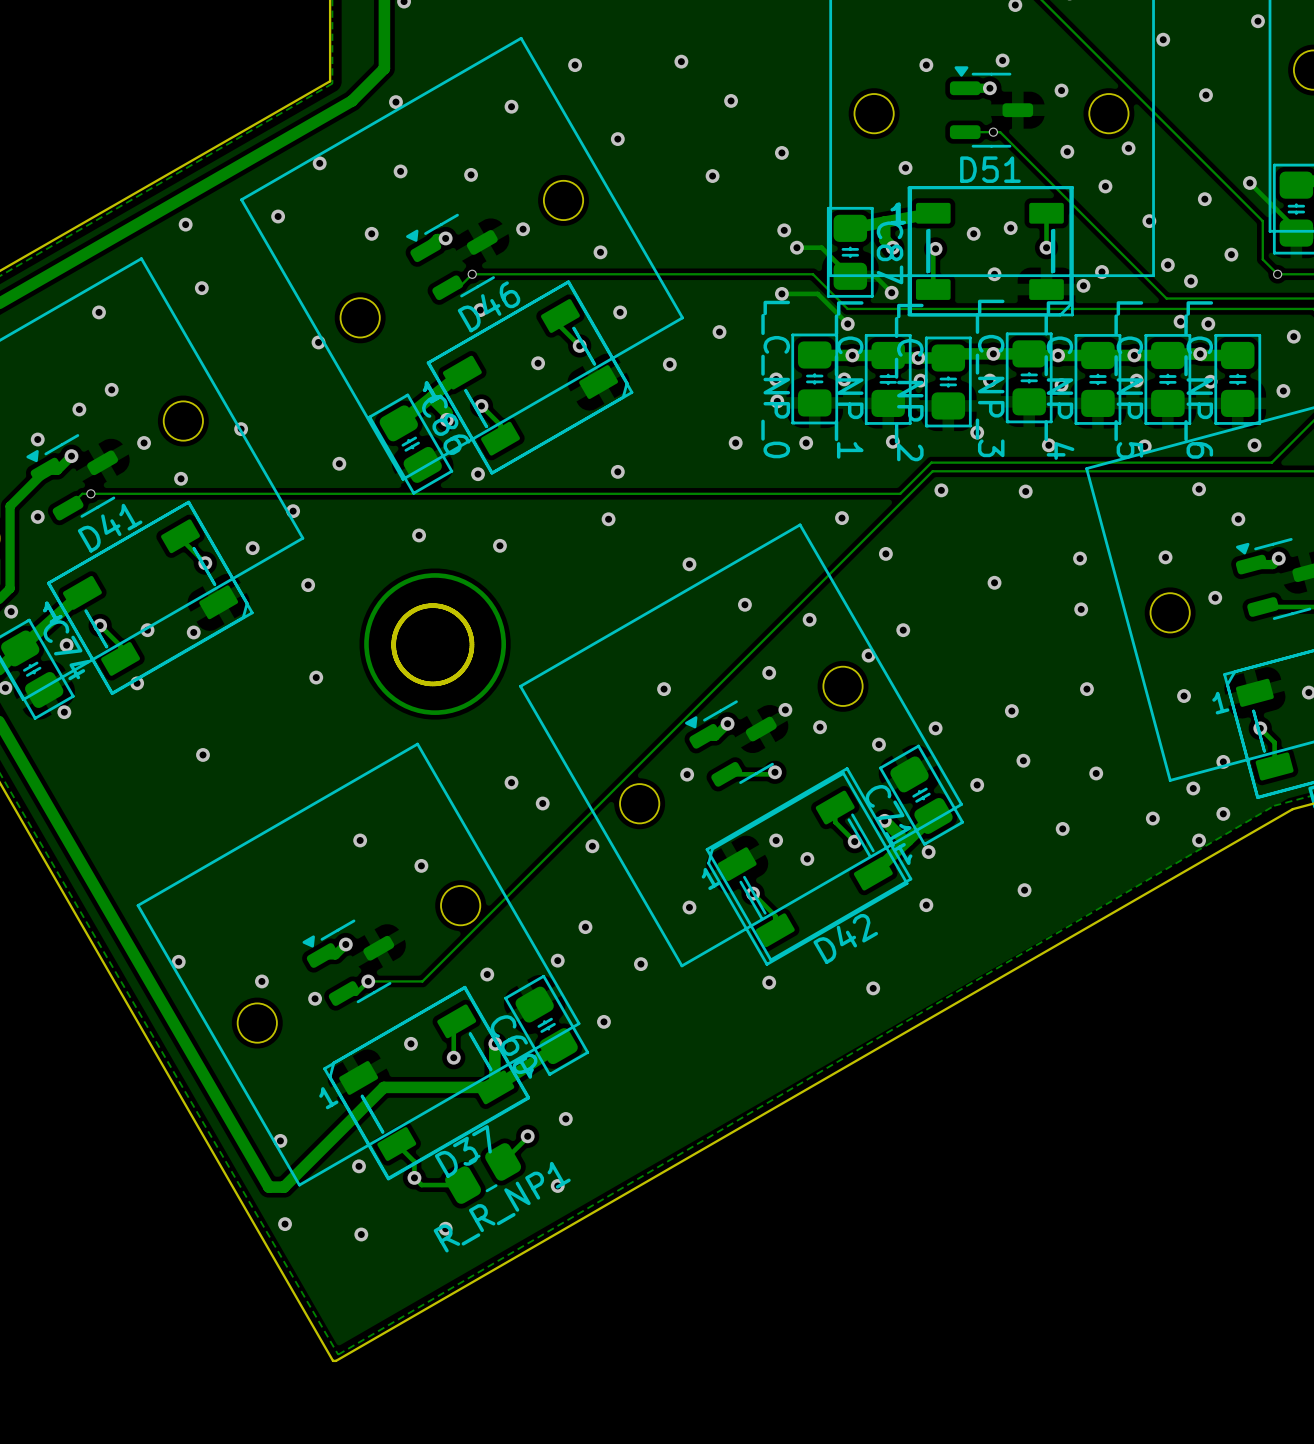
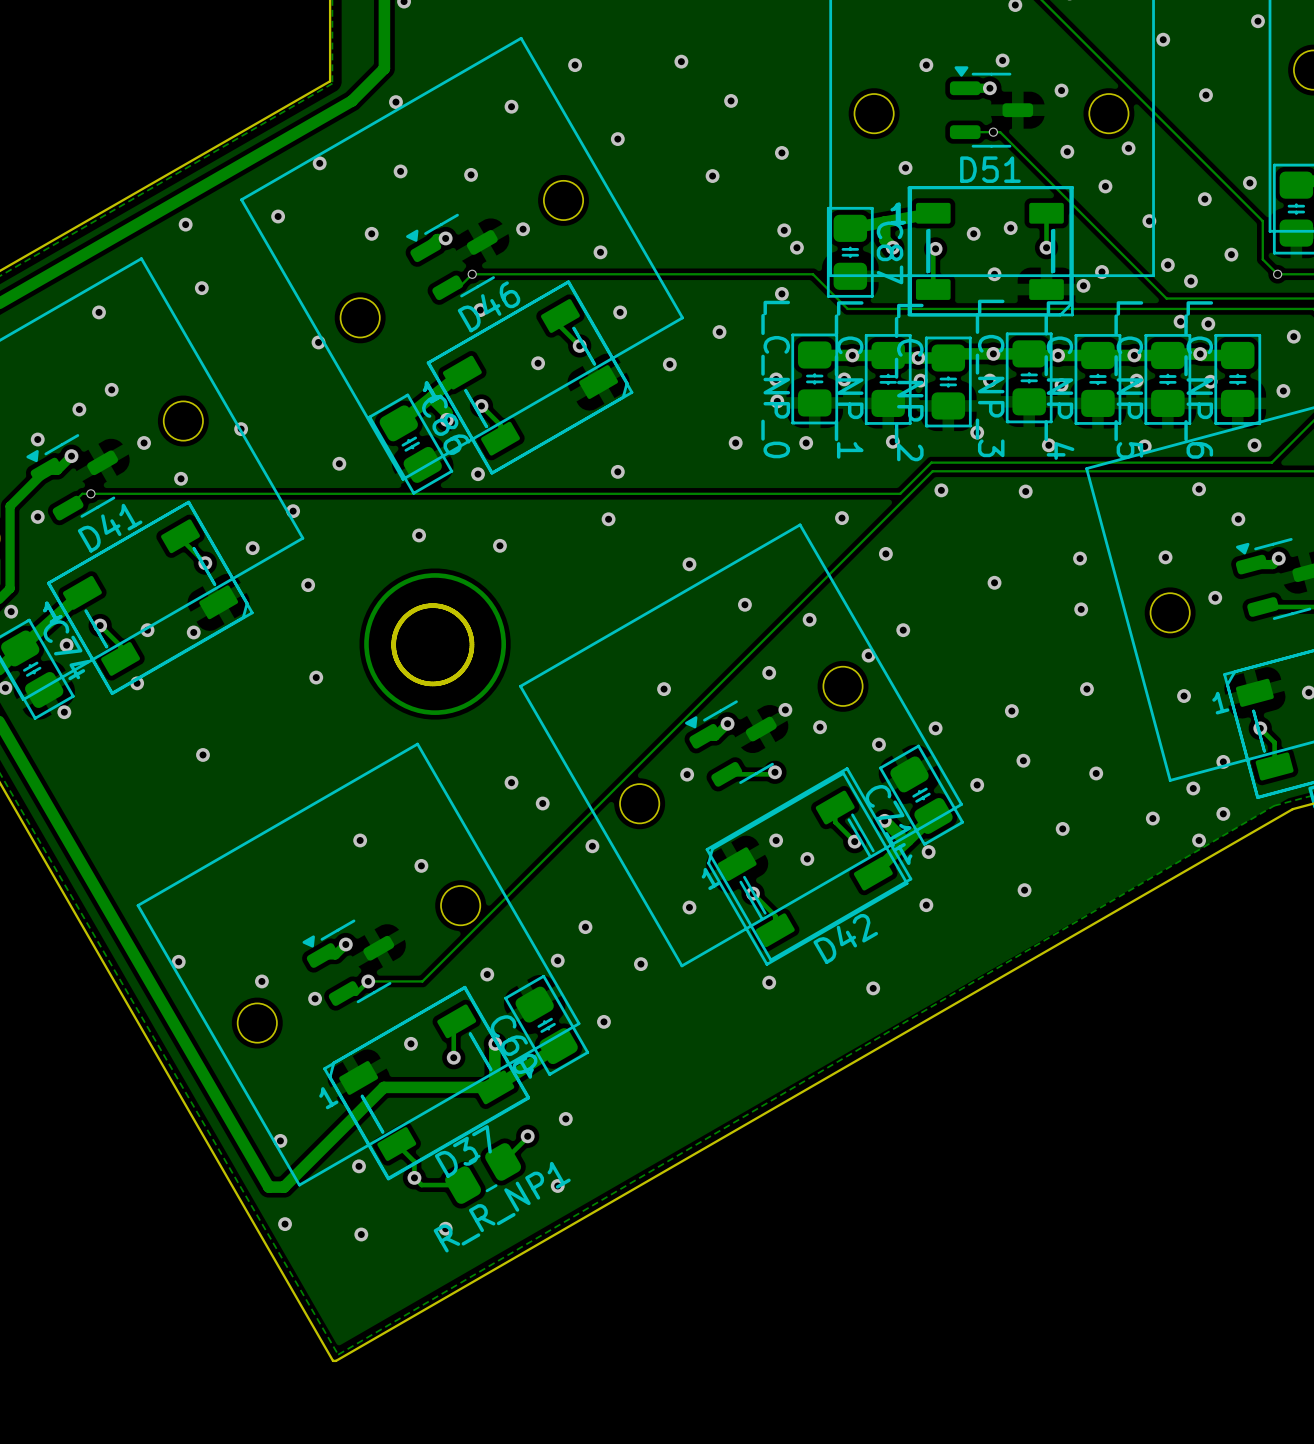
track: (1249, 182) (1296, 229) (1296, 233) -> none
track: (796, 247) (821, 247) (850, 276) (875, 276) (891, 292) -> none
via: (891, 292) -> none
track: (781, 293) (817, 293) (847, 323) -> none
via: (847, 323) -> none

